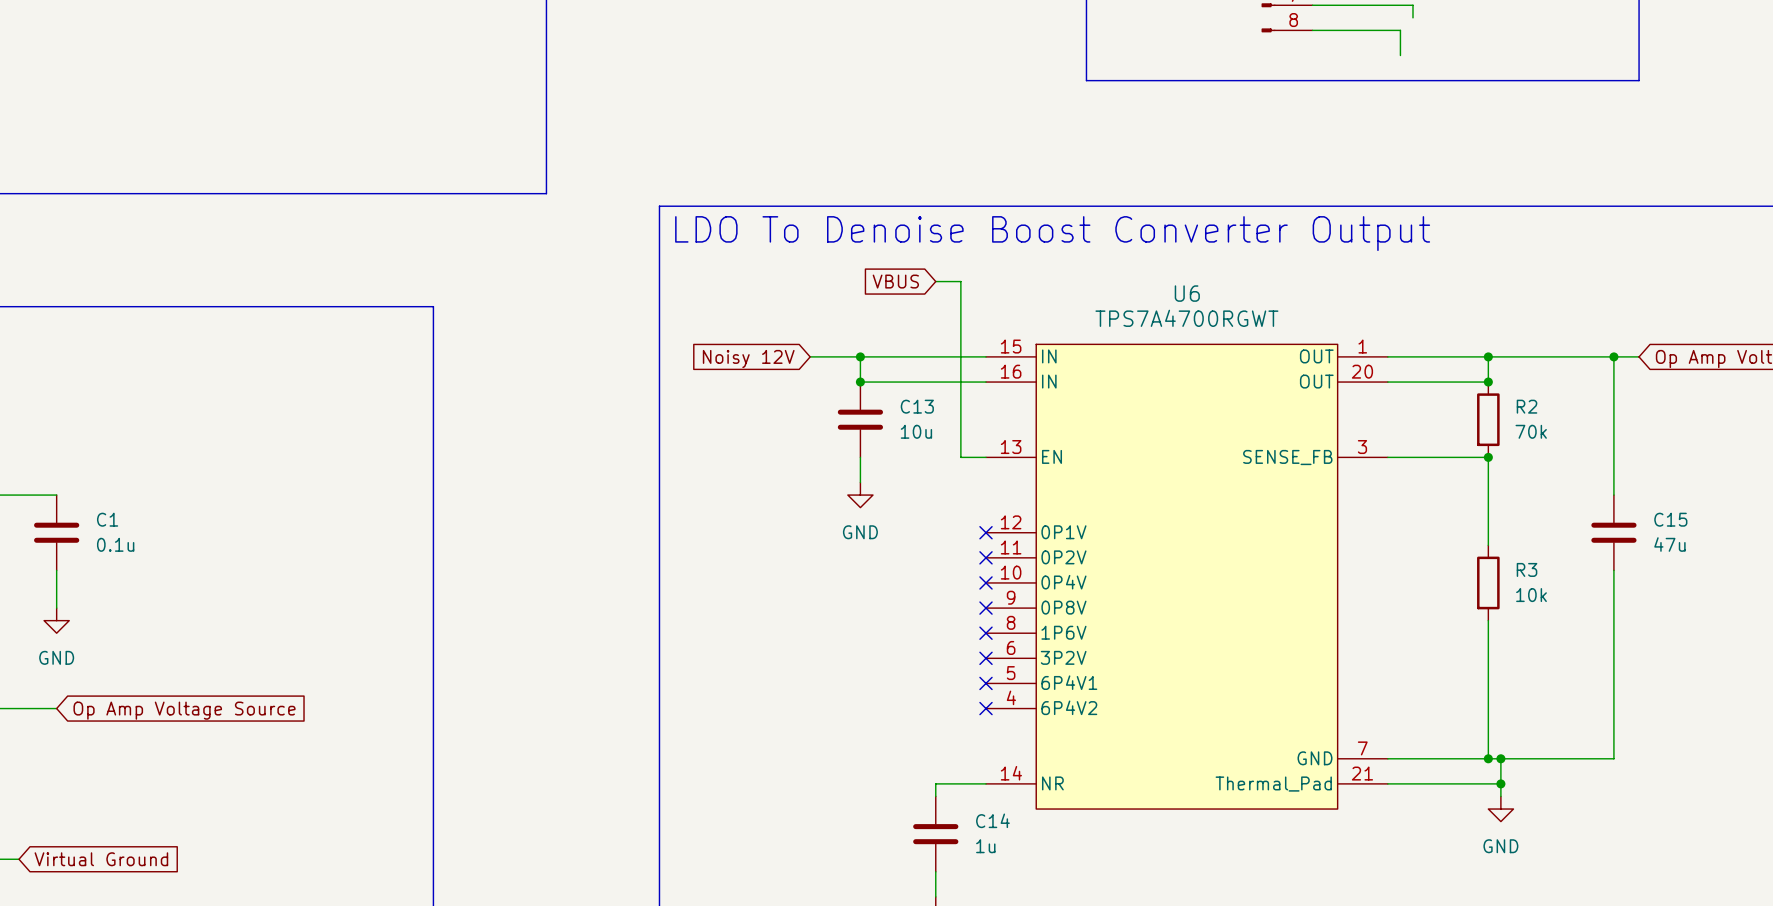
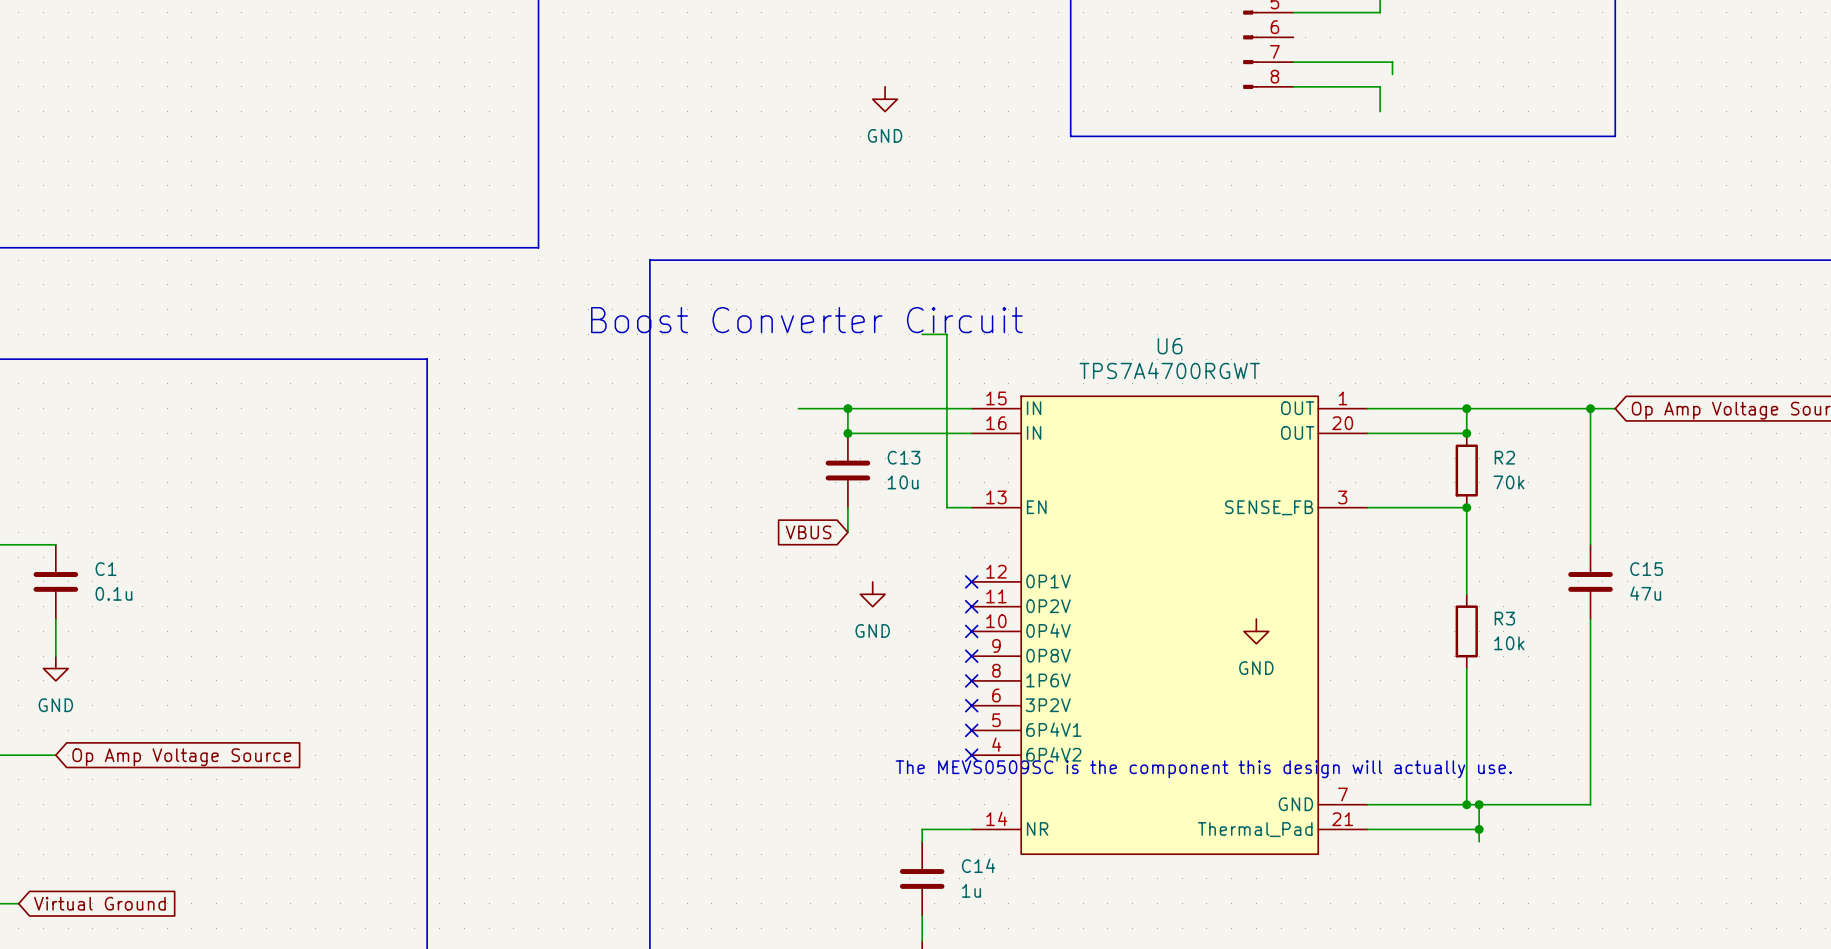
power symbol: none -> GND (885, 99)
text: LDO To Denoise Boost Converter Output (1052, 233) -> none
text: none -> Boost Converter Circuit (806, 320)
global label position: VBUS (895, 281) -> VBUS (808, 532)
global label: Noisy 12V (748, 359) -> none
power symbol position: GND (860, 495) -> GND (872, 594)
power symbol: none -> GND (1256, 631)
text: none -> The MEVS0509SC is the component this design will actually use. (1203, 769)
power symbol: GND (1500, 809) -> none

